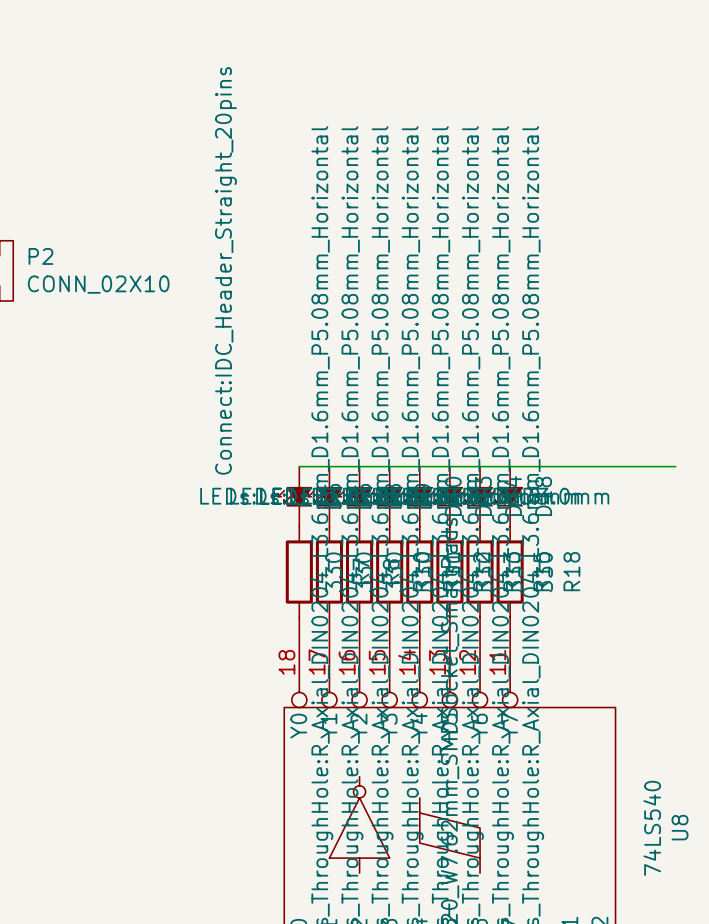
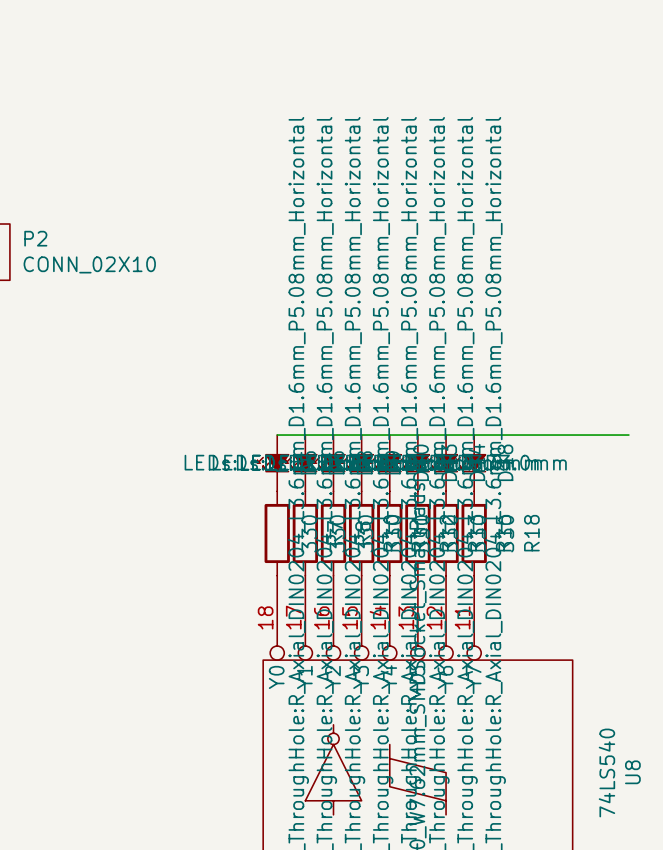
P2 text: Connect:IDC_Header_Straight_20pins (225, 270) -> none

